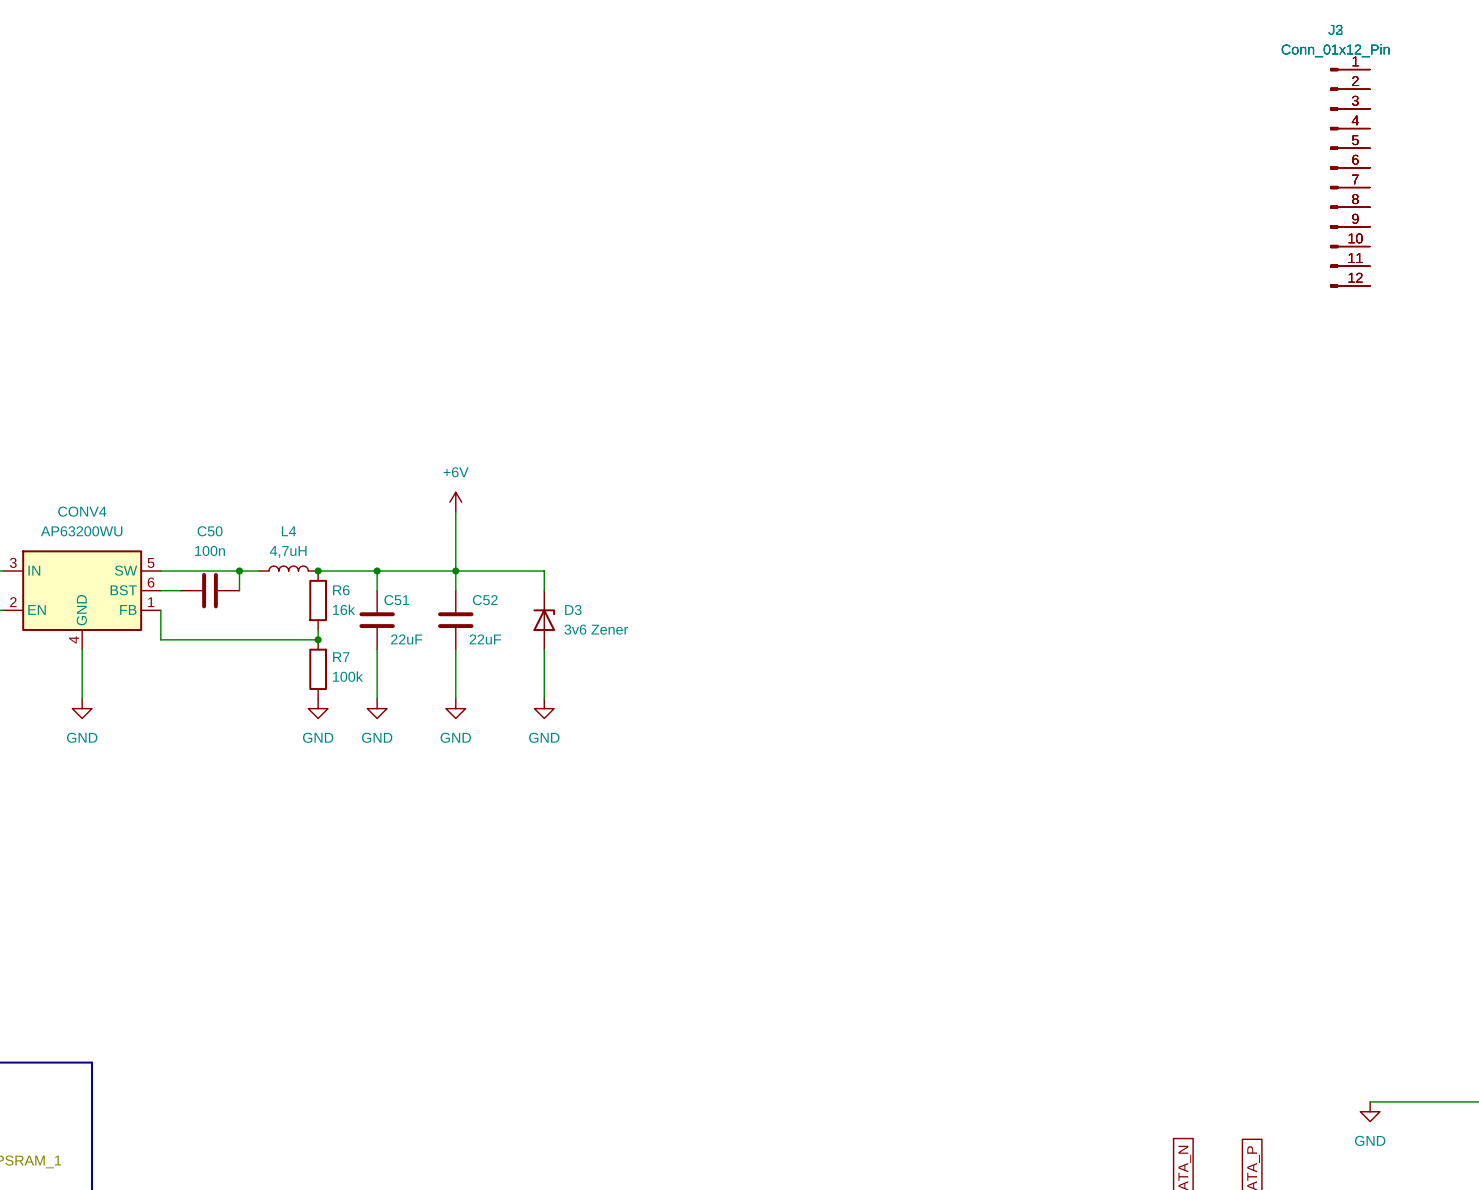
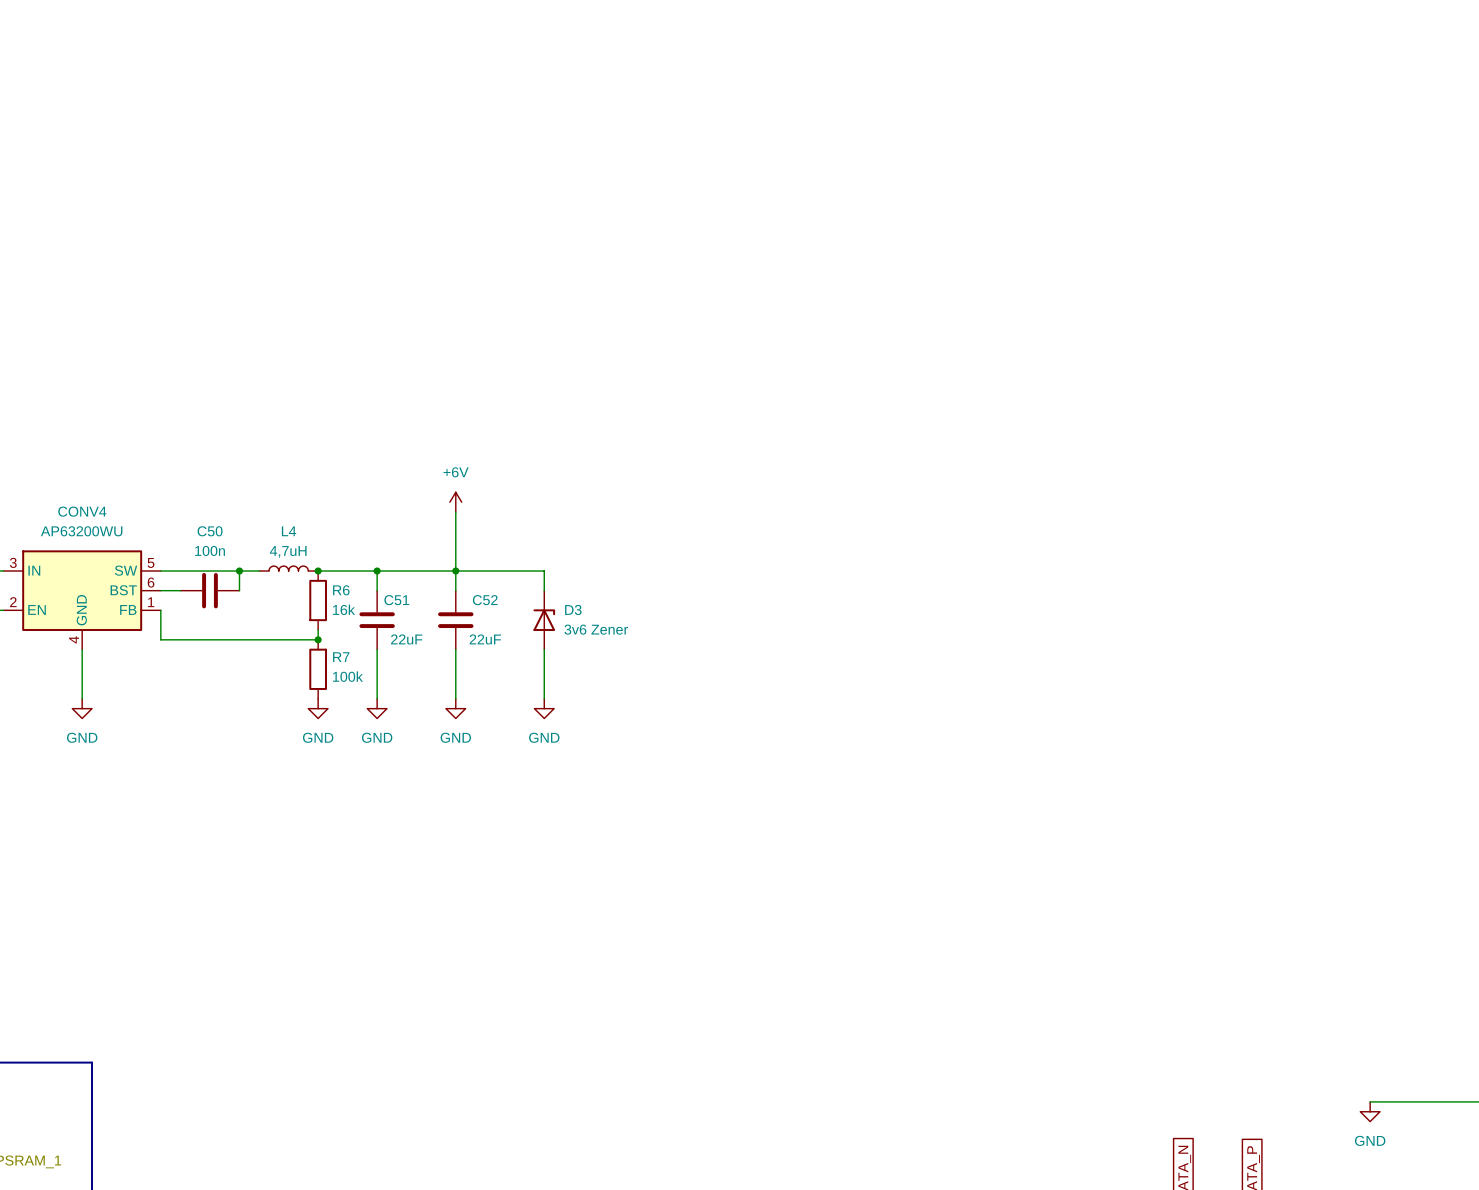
part: Conn_01x12_Pin (1350, 177) -> none
part: Conn_01x12_Pin (1350, 177) -> none

